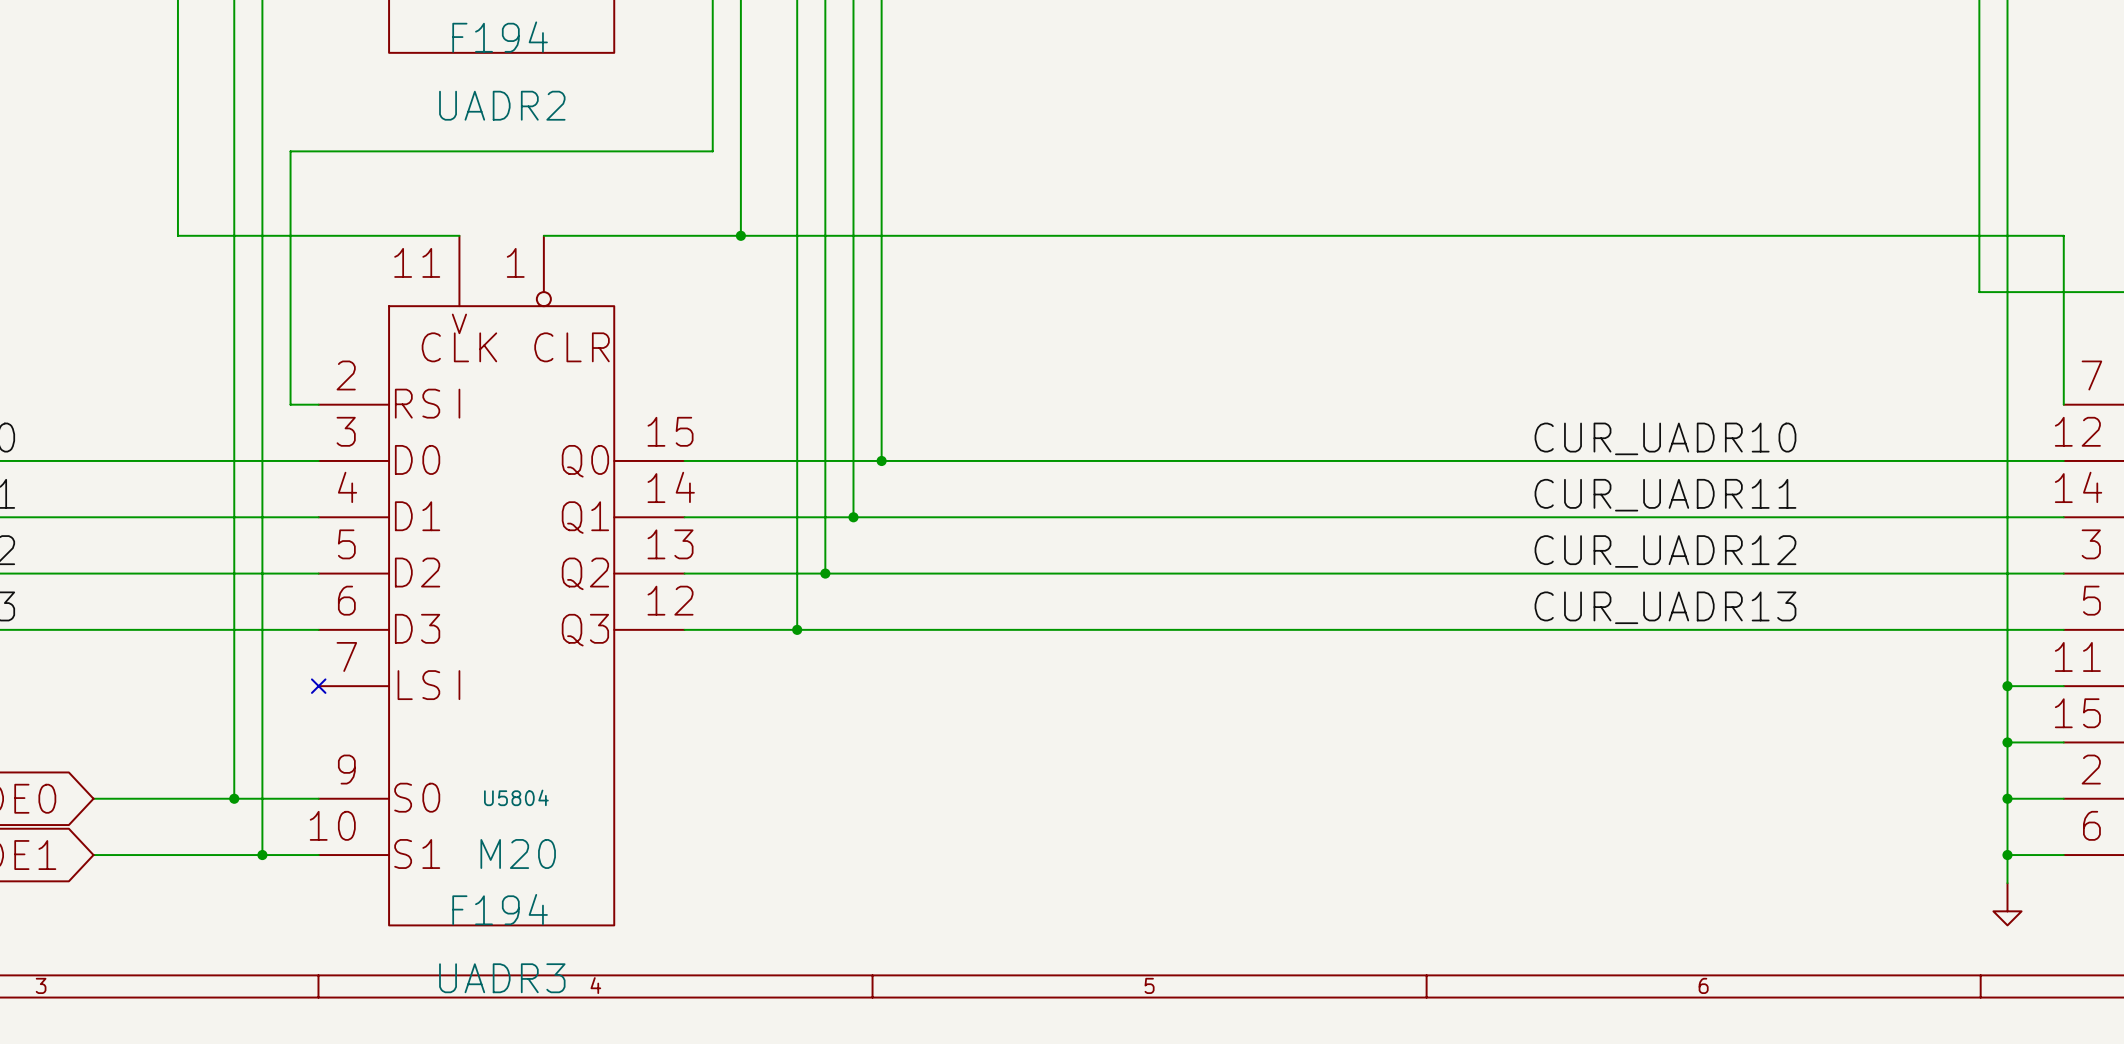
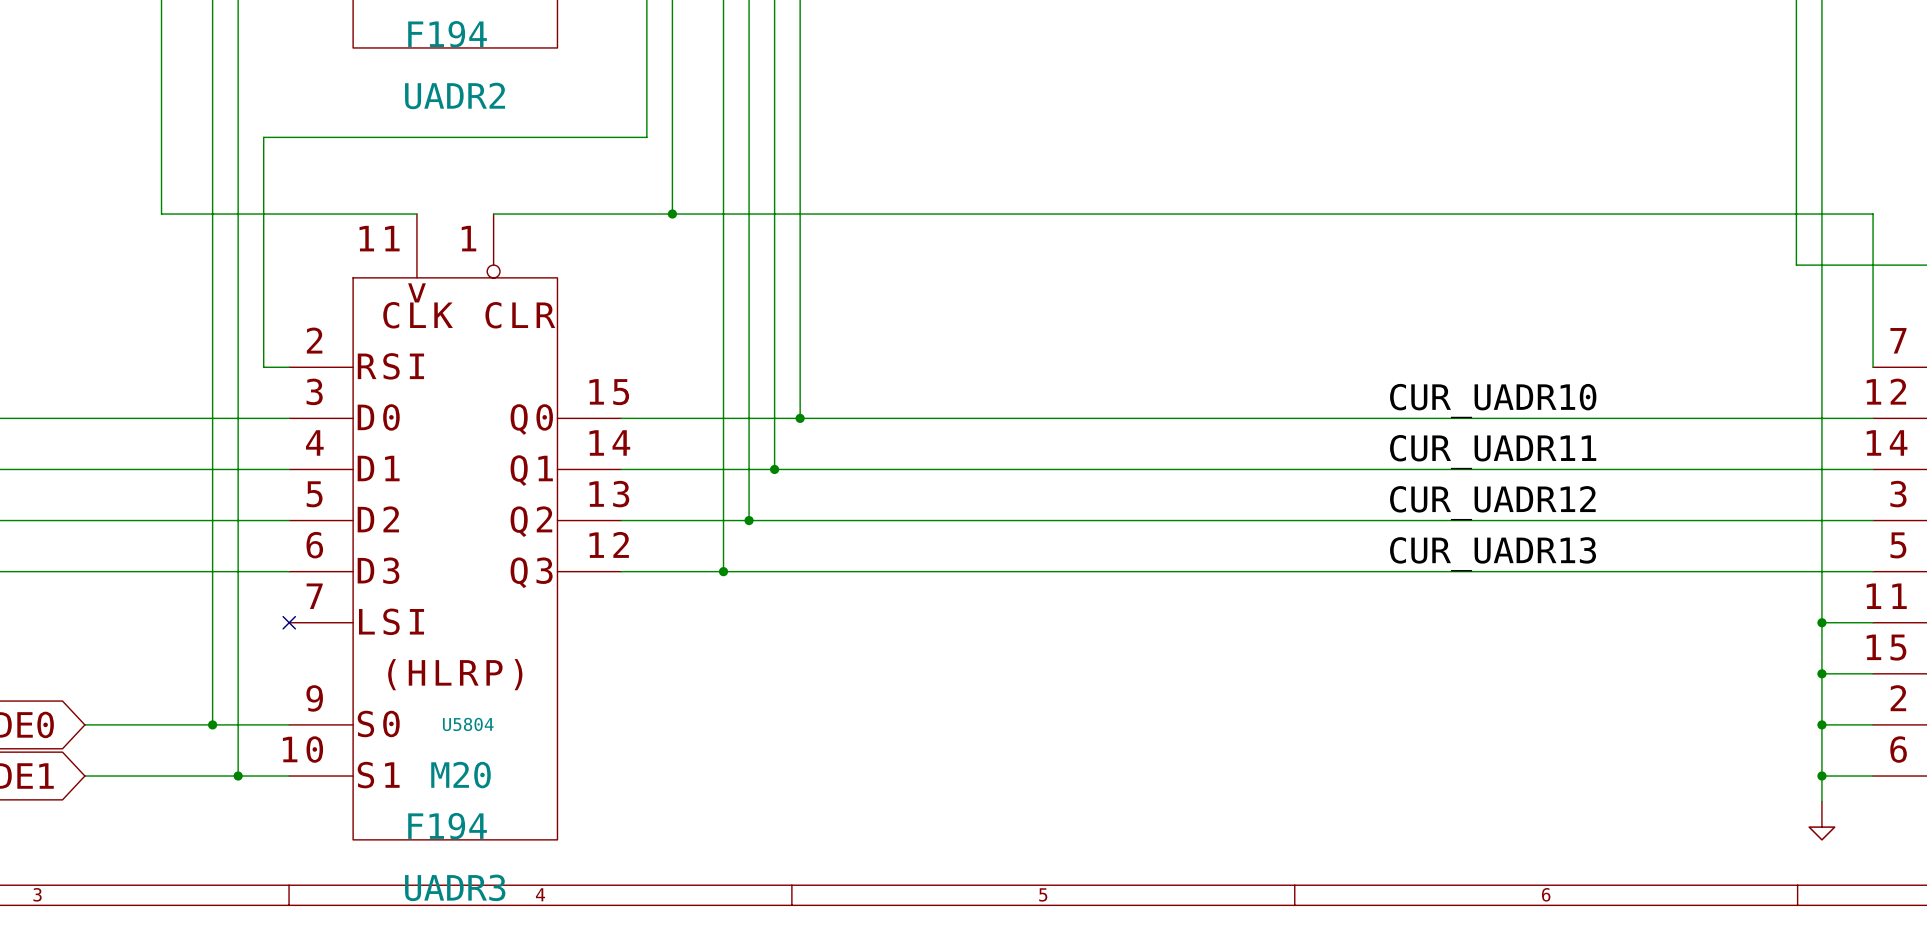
U5804 text: none -> H (416, 672)
U5804 text: none -> L (443, 672)
U5804 text: none -> R (469, 672)
U5804 text: none -> P (494, 672)
U5804 text: none -> ( (392, 674)
U5804 text: none -> ) (518, 674)

